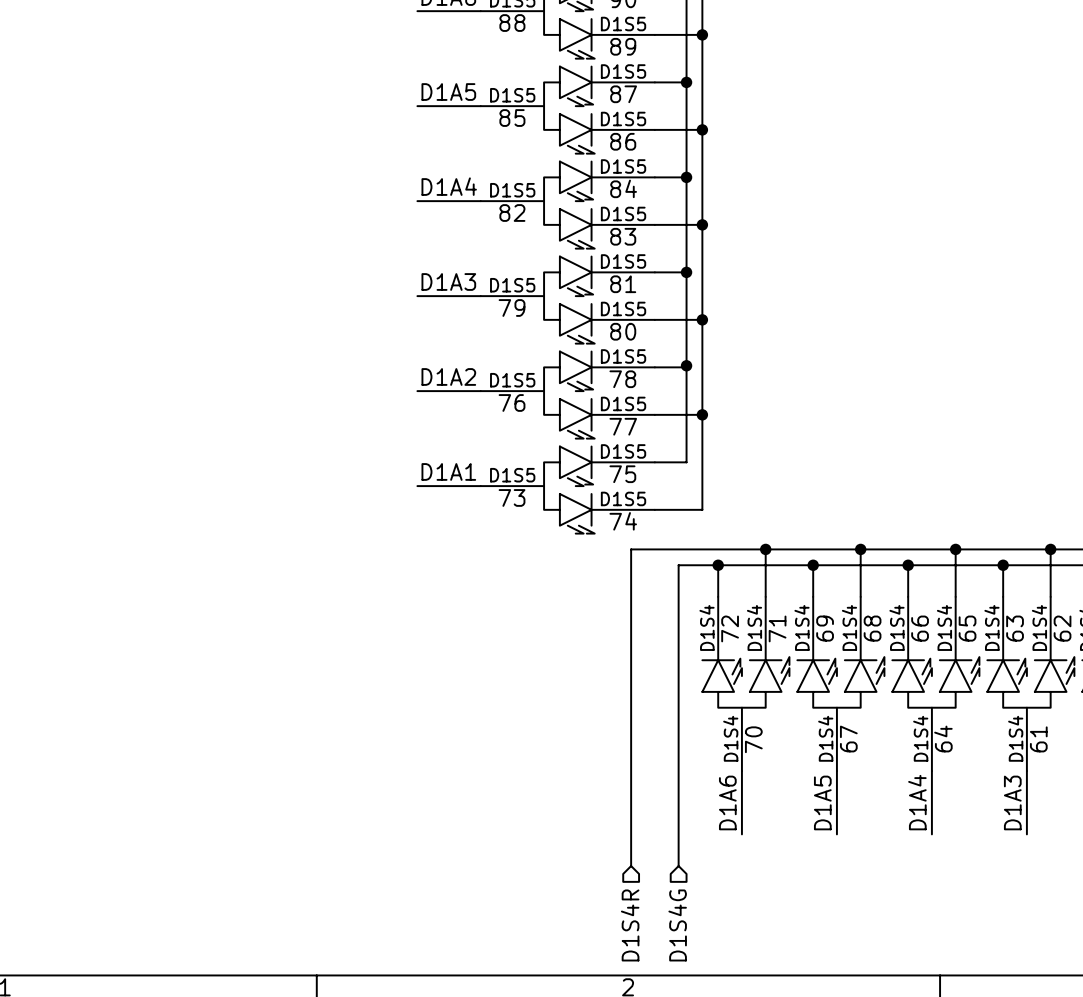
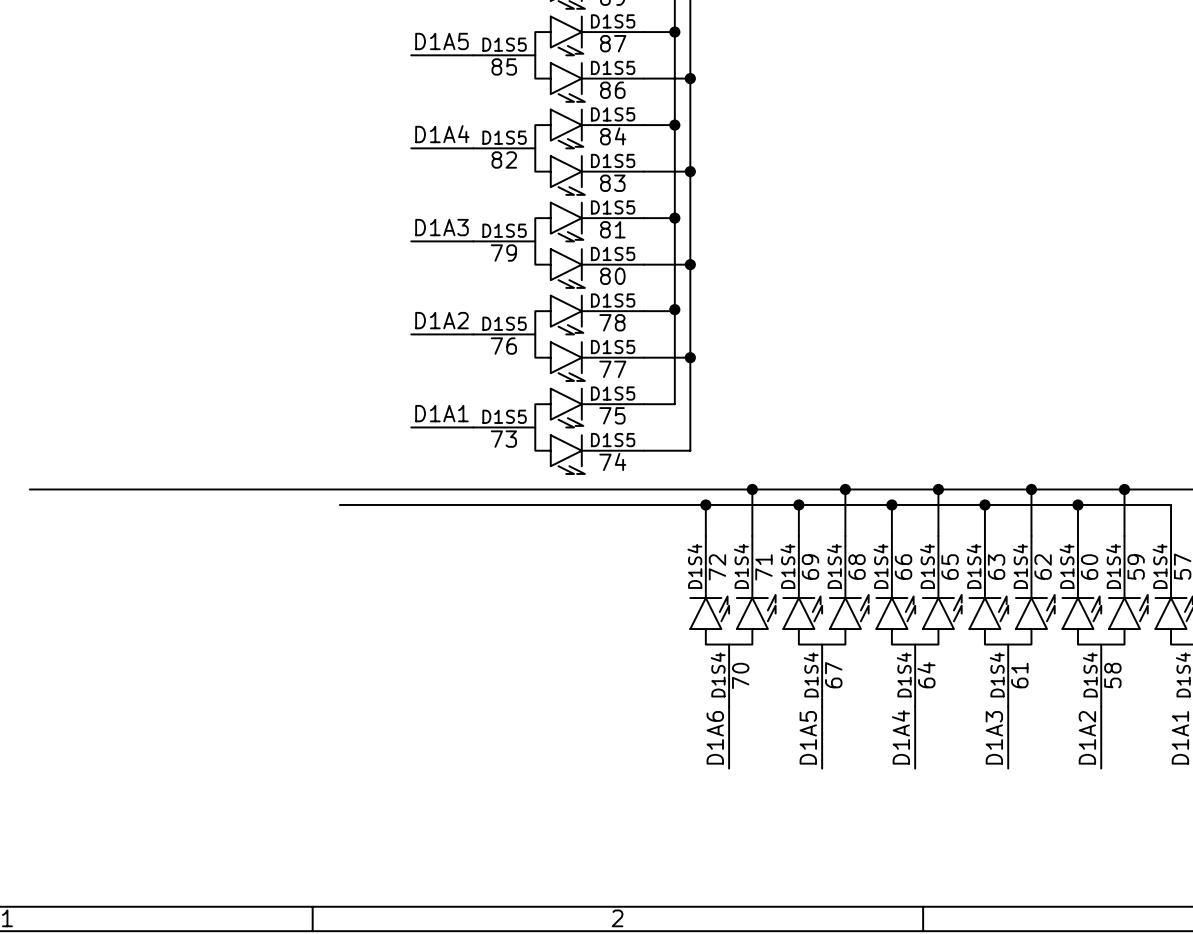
wire: (631, 549) (631, 866) -> (620, 489) (29, 489)
wire: (678, 565) (678, 866) -> (667, 504) (339, 504)
hierarchical label: D1S4R (630, 925) -> none
hierarchical label: D1S4G (677, 925) -> none

